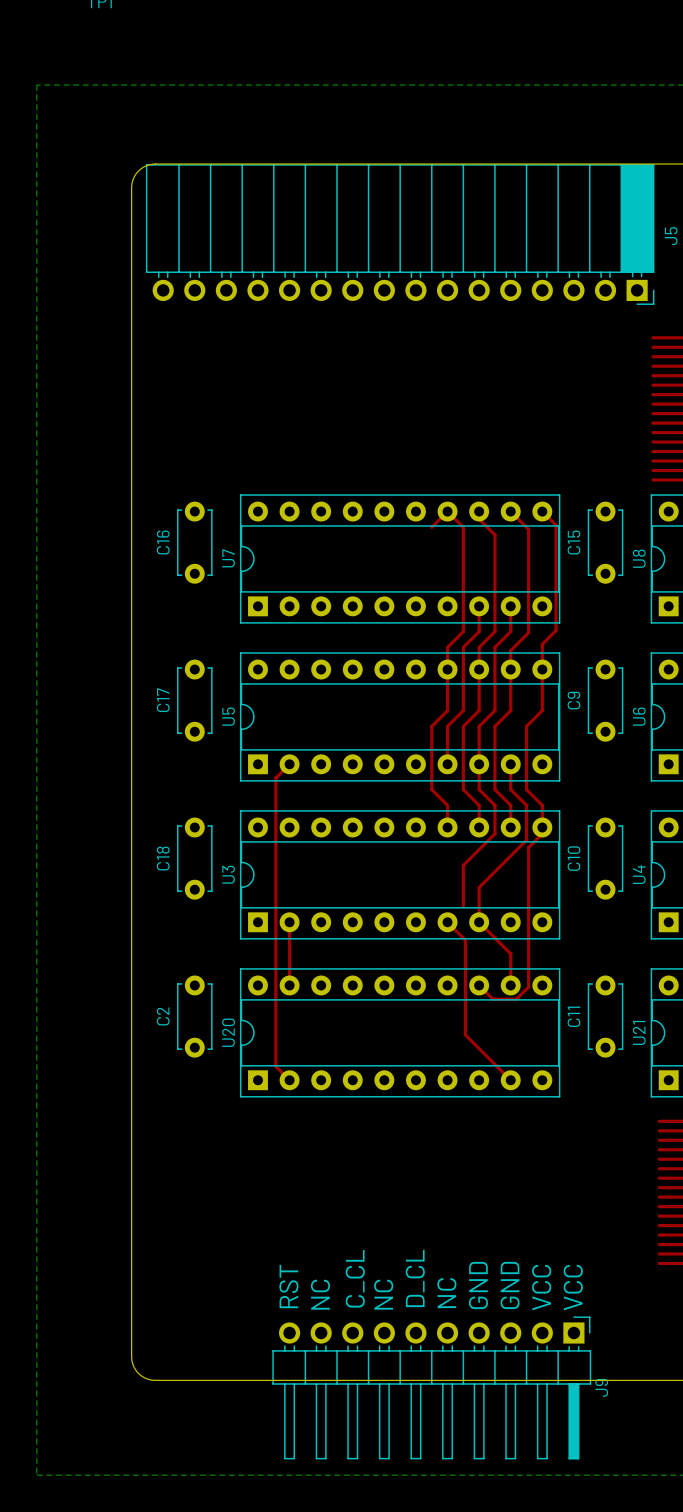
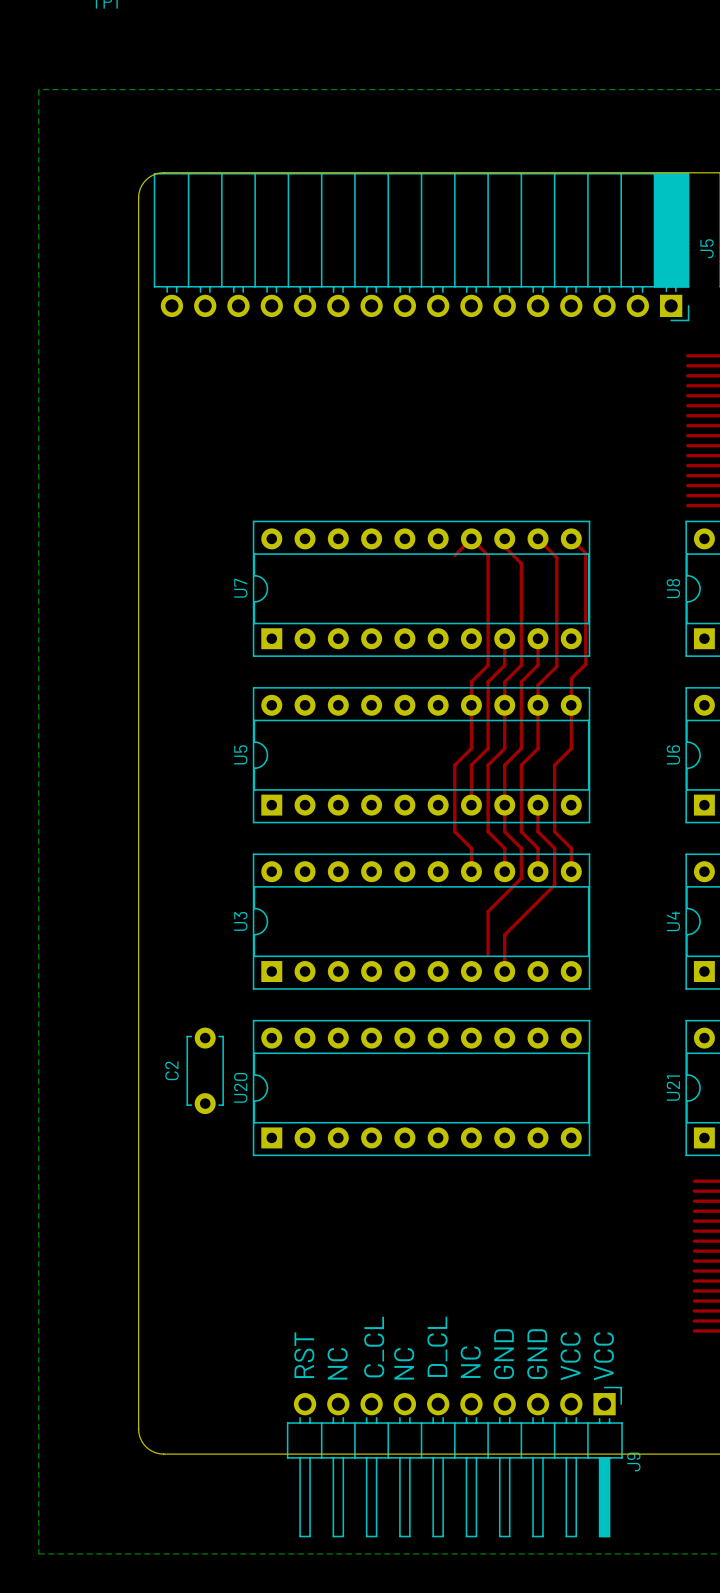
C16: (194, 542) -> none
C15: (605, 542) -> none
C17: (194, 700) -> none
C9: (605, 700) -> none
top track: (289, 764) (275, 778) (275, 1066) (289, 1080) -> none
top track: (542, 827) (542, 833) (528, 847) (528, 987) (516, 999) (492, 999) (479, 985) -> none
C18: (194, 858) -> none
C10: (605, 858) -> none
top track: (289, 922) (289, 985) -> none
top track: (447, 922) (465, 940) (465, 1034) (510, 1080) -> none
top track: (479, 922) (510, 953) (510, 985) -> none
C11: (605, 1016) -> none

